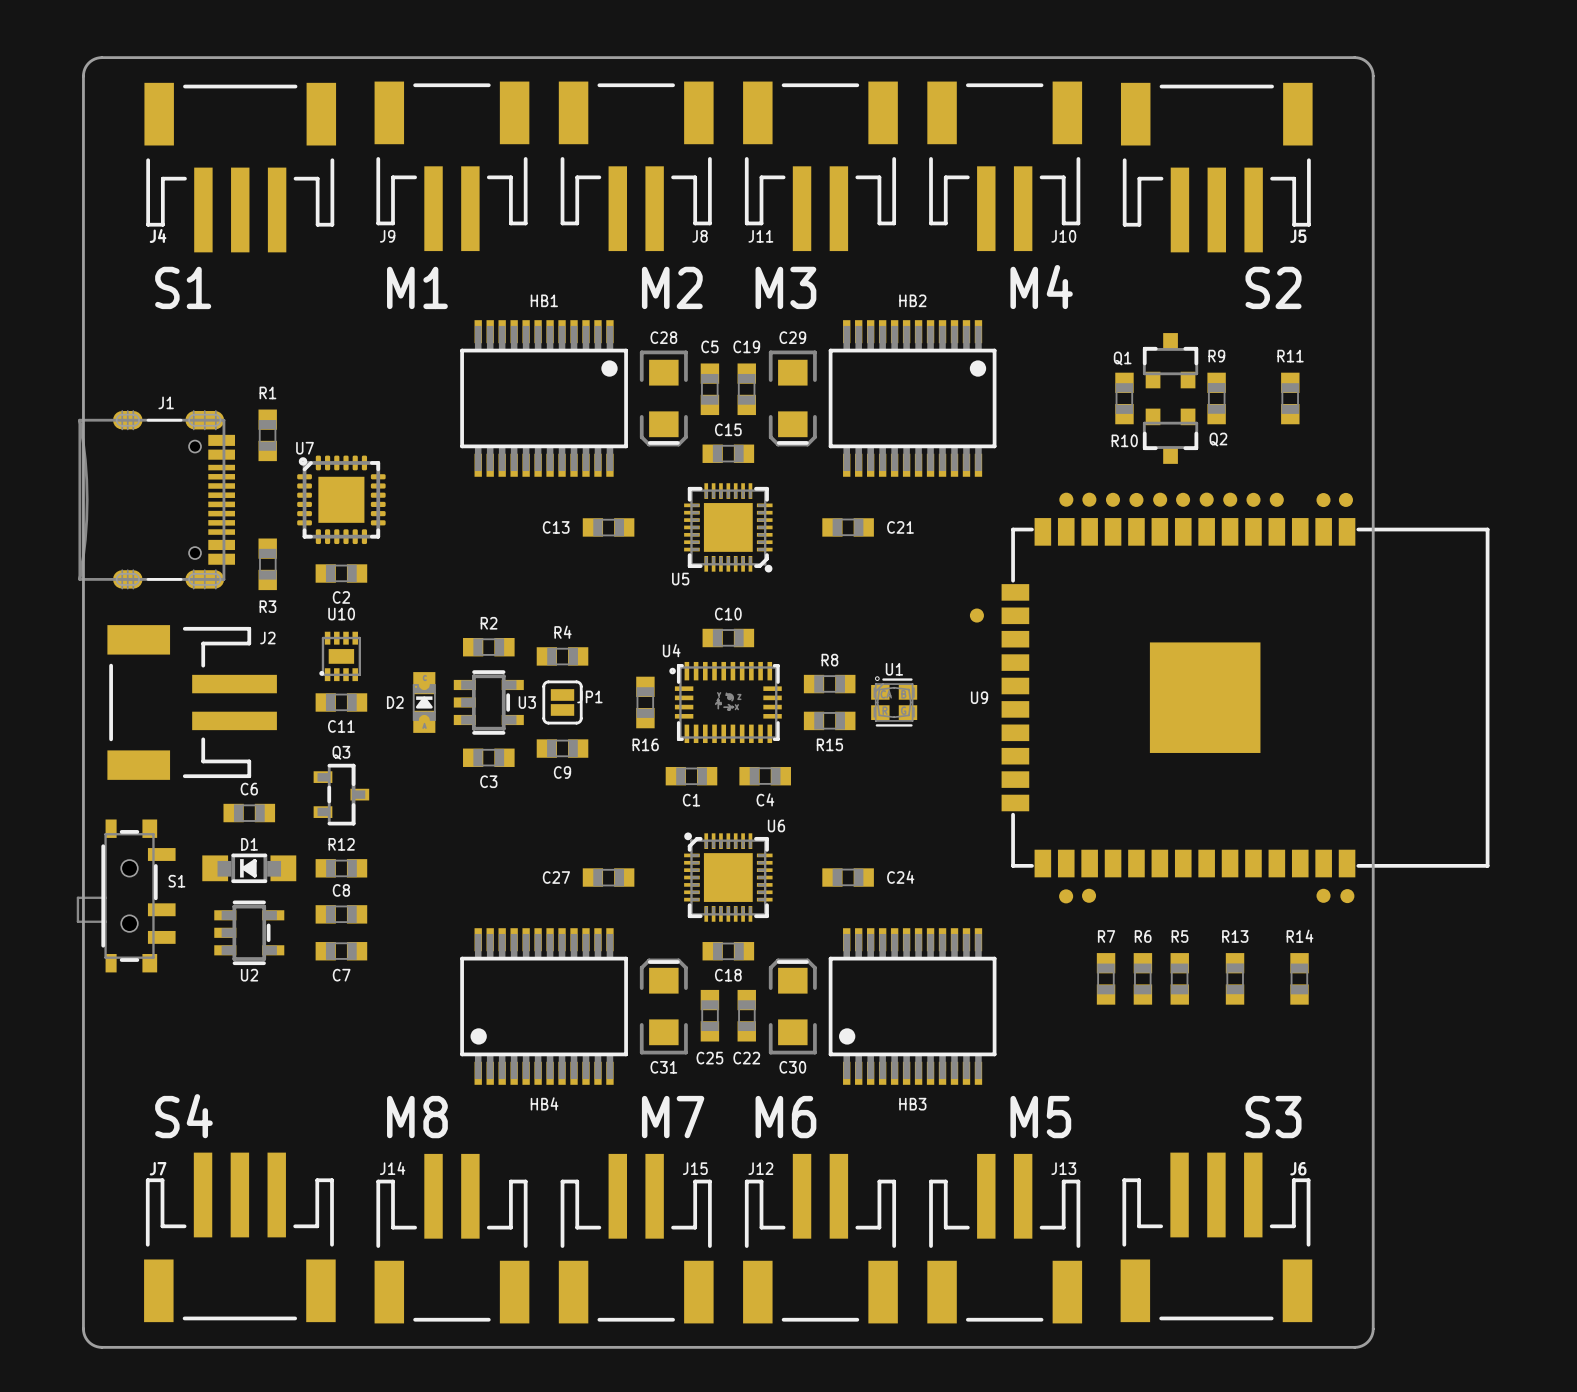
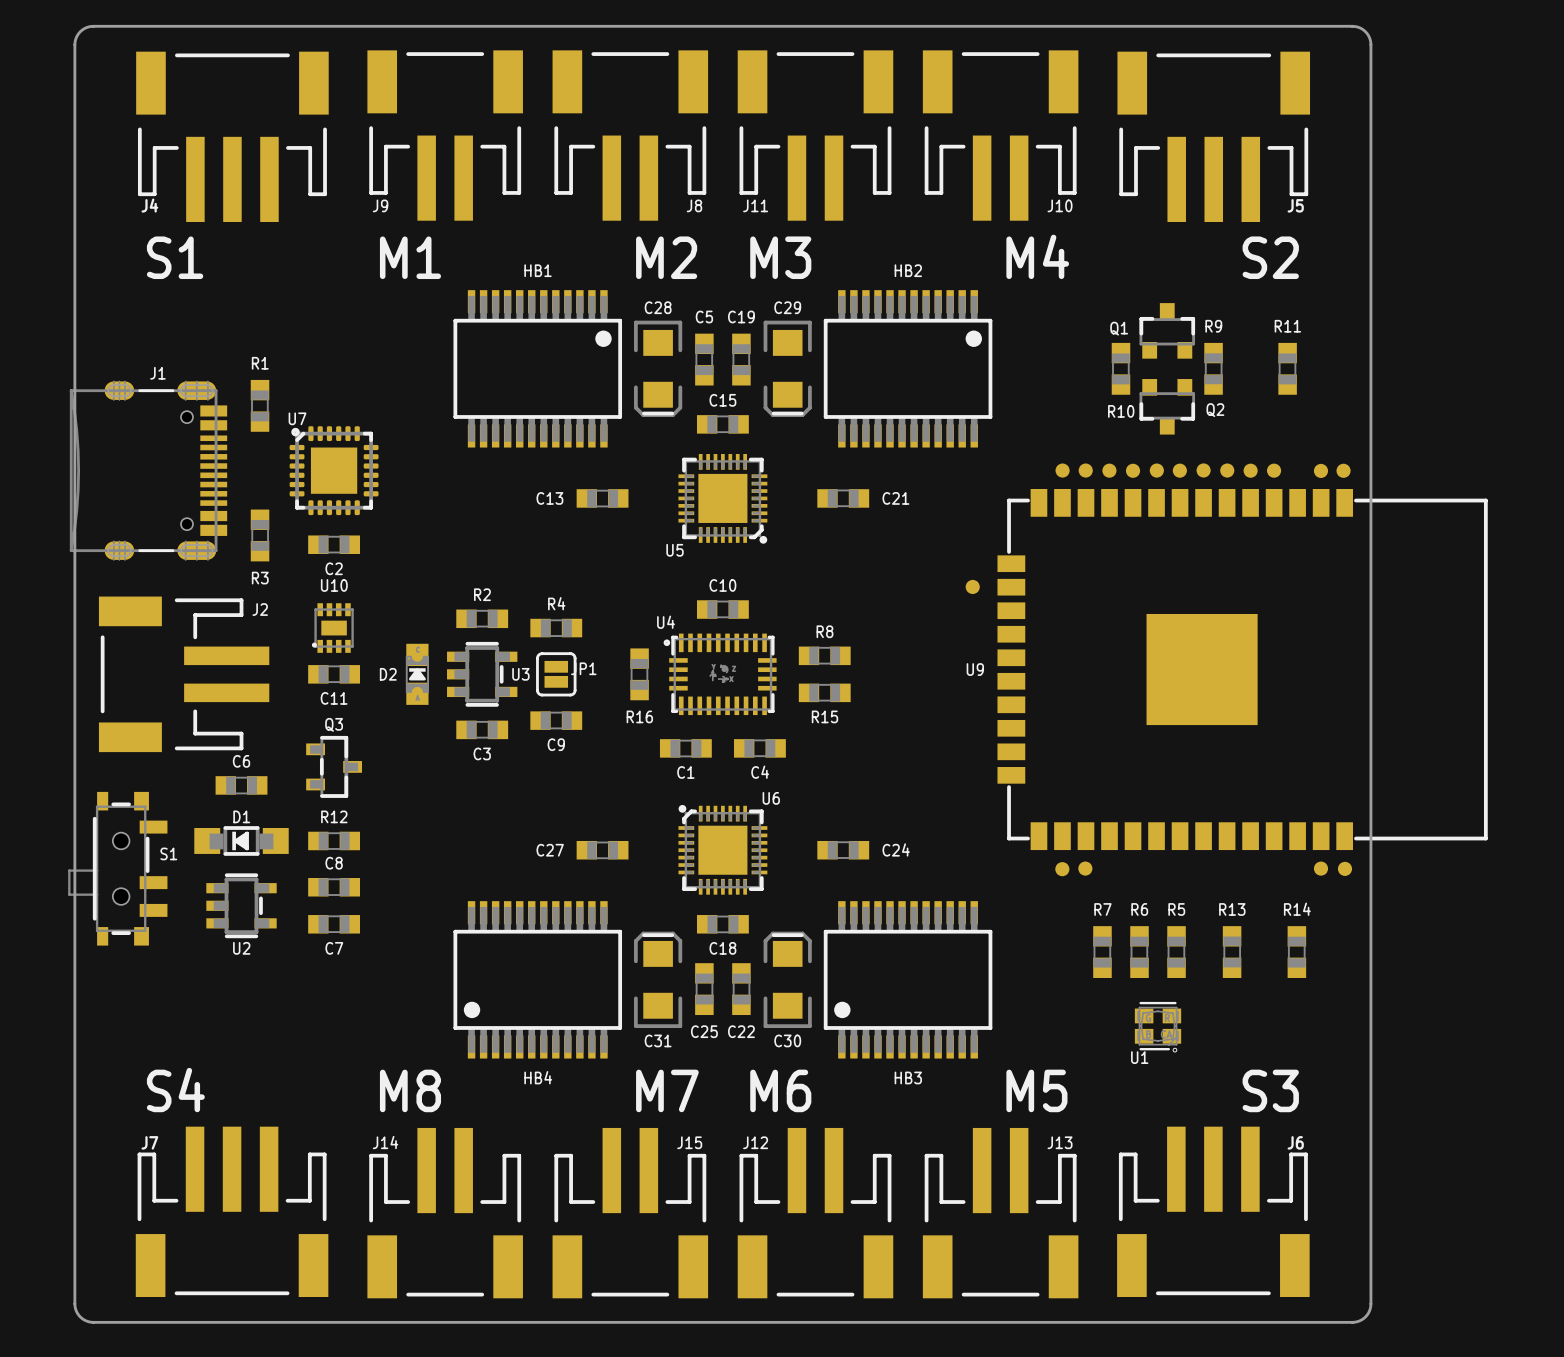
text: U1 (894, 669) -> none
part: (894, 701) -> none
part: none -> (1158, 1027)
text: none -> U1 (1139, 1057)

